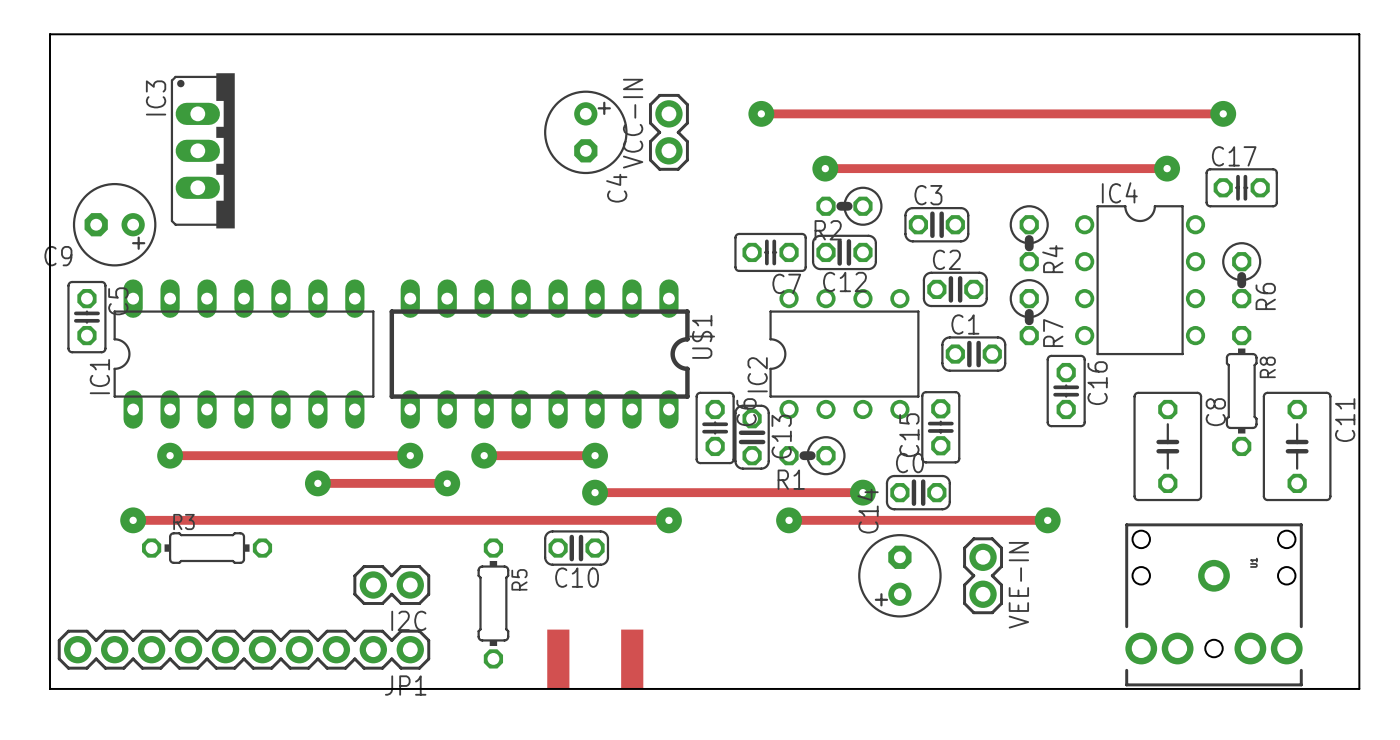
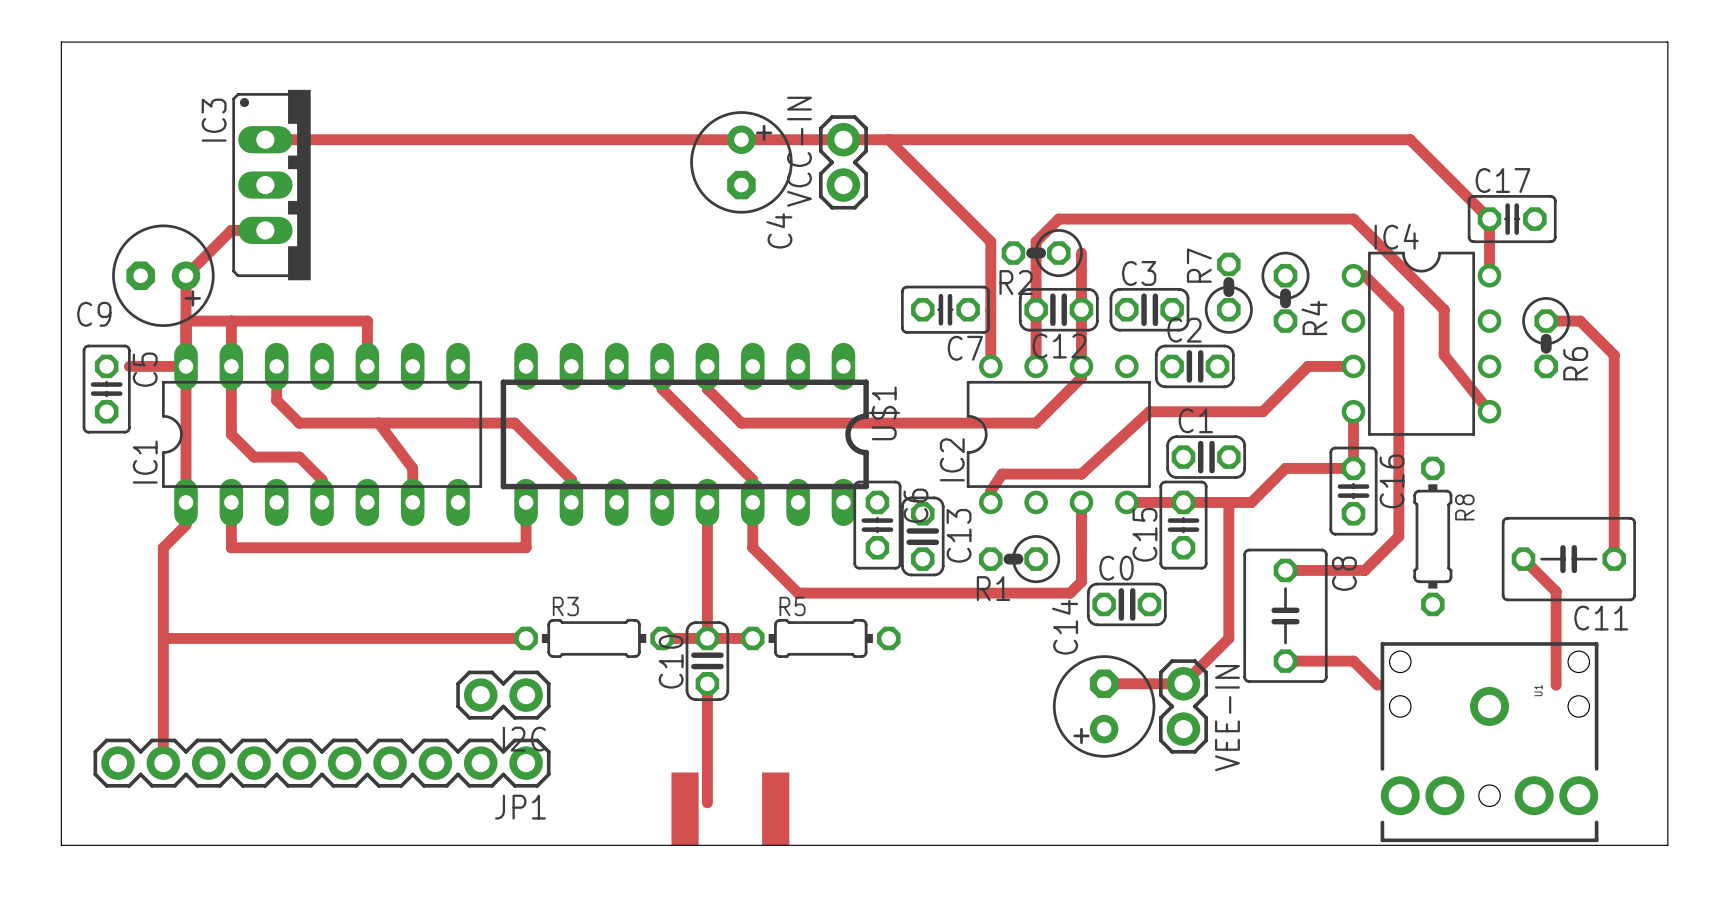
track: none -> (265, 139) (934, 139)
track: none -> (888, 139) (990, 241) (990, 366)
via: (761, 113) -> none
track: (1149, 113) (1223, 113) -> (1410, 139) (1489, 219) (1489, 275)
via: (1223, 113) -> none
C4 position: (585, 132) -> (741, 162)
VCC-IN position: (668, 132) -> (843, 162)
IC3 position: (202, 150) -> (271, 185)
track: (825, 168) (1167, 168) -> none
via: (825, 168) -> none
via: (1167, 168) -> none
track: none -> (265, 230) (231, 230) (186, 275) (186, 525) (163, 547) (163, 763)
C17 position: (1241, 187) -> (1512, 219)
track: none -> (1081, 253) (1081, 377) (1036, 423) (741, 423) (707, 389) (707, 366)
C9 position: (114, 224) -> (163, 275)
C3 position: (936, 224) -> (1149, 309)
track: none -> (1353, 275) (1364, 275) (1398, 309) (1398, 536) (1364, 570) (1285, 570)
R4 position: (1029, 238) -> (1285, 292)
C12 position: (844, 252) -> (1058, 309)
track: none -> (186, 321) (367, 321) (367, 366)
track: none -> (231, 321) (231, 434) (254, 457) (299, 457) (322, 479) (322, 502)
track: none -> (1546, 321) (1580, 321) (1614, 355) (1614, 559)
R6 position: (1241, 275) -> (1546, 337)
IC4 position: (1140, 280) -> (1421, 343)
C2 position: (955, 289) -> (1194, 366)
track: none -> (129, 366) (186, 366)
track: none -> (276, 366) (276, 400) (299, 423) (514, 423) (571, 479) (571, 502)
track: none -> (662, 366) (662, 389) (752, 479) (752, 547) (798, 593) (1070, 593) (1081, 581) (1081, 502)
track: none -> (1036, 366) (1036, 241) (1058, 219) (1353, 219) (1444, 309) (1444, 355) (1489, 411)
track: none -> (1353, 366) (1308, 366) (1262, 411) (1149, 411) (1081, 474) (1002, 474) (990, 491) (990, 502)
R7 rotation: 0° (1029, 312) -> 180° (1228, 293)
R7 position: (1029, 312) -> (1228, 293)
track: none -> (1353, 411) (1353, 468) (1285, 468) (1251, 502) (1126, 502)
track: none -> (378, 423) (412, 468) (412, 502)
IC1 position: (244, 354) -> (322, 434)
U$1 position: (539, 354) -> (684, 434)
IC2 position: (844, 354) -> (1058, 434)
C1 position: (973, 354) -> (1206, 457)
C16 position: (1066, 391) -> (1353, 491)
R8 position: (1241, 391) -> (1432, 536)
track: none -> (231, 502) (231, 547) (526, 547) (526, 502)
track: none -> (707, 502) (707, 638)
track: none -> (1228, 502) (1228, 638) (1183, 683) (1104, 683)
C15 position: (940, 427) -> (1183, 525)
C8 position: (1167, 446) -> (1285, 615)
C11 rotation: 0° (1297, 446) -> 90° clockwise (1568, 559)
track: (170, 455) (410, 455) -> none
via: (170, 455) -> none
via: (410, 455) -> none
track: (484, 455) (595, 455) -> none
via: (484, 455) -> none
via: (595, 455) -> none
R1 position: (812, 455) -> (1019, 559)
track: none -> (1523, 559) (1556, 591) (1556, 685)
track: (317, 483) (447, 483) -> none
via: (317, 483) -> none
via: (447, 483) -> none
track: (595, 492) (862, 492) -> none
via: (595, 492) -> none
via: (862, 492) -> none
via: (133, 520) -> none
track: (428, 520) (539, 520) -> none
track: (613, 520) (668, 520) -> none
via: (668, 520) -> none
track: (789, 520) (1047, 520) -> none
via: (789, 520) -> none
via: (1047, 520) -> none
track: none -> (1285, 661) (1353, 661) (1377, 685)
R3 position: (207, 548) -> (594, 638)
C10 rotation: 0° (576, 548) -> 90° clockwise (707, 661)
track: none -> (707, 683) (707, 802)
VEE-IN position: (983, 575) -> (1183, 706)
R5 name position: R5 (519, 579) -> R5 (792, 606)
I2C position: (391, 585) -> (503, 695)
R5 rotation: 0° (493, 603) -> 90° clockwise (820, 638)
R5 position: (493, 603) -> (820, 638)
JP1 position: (244, 649) -> (322, 763)

